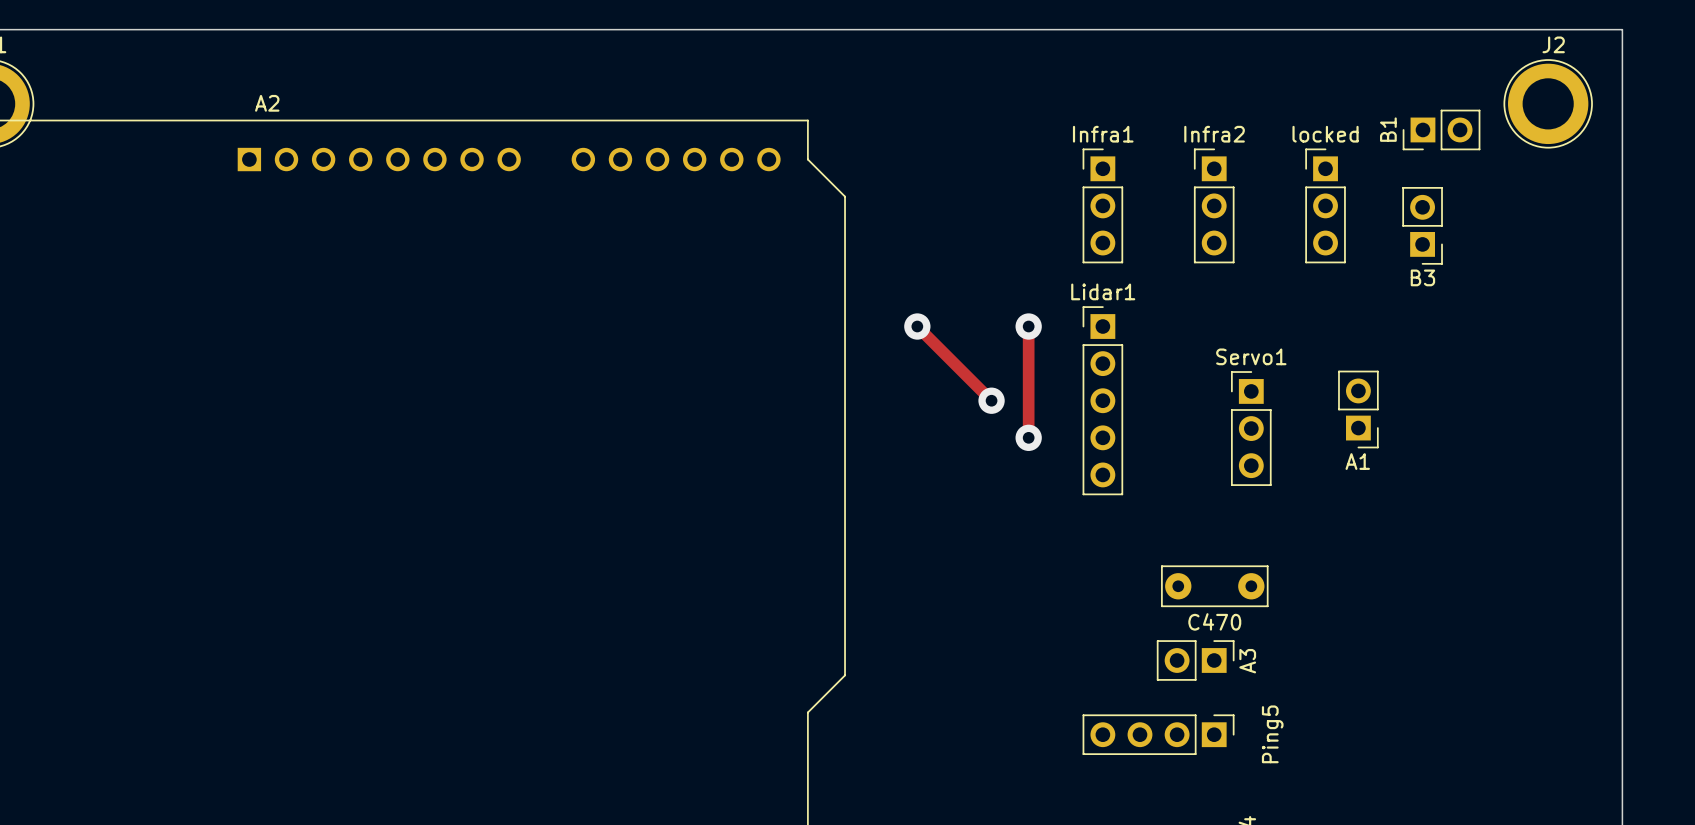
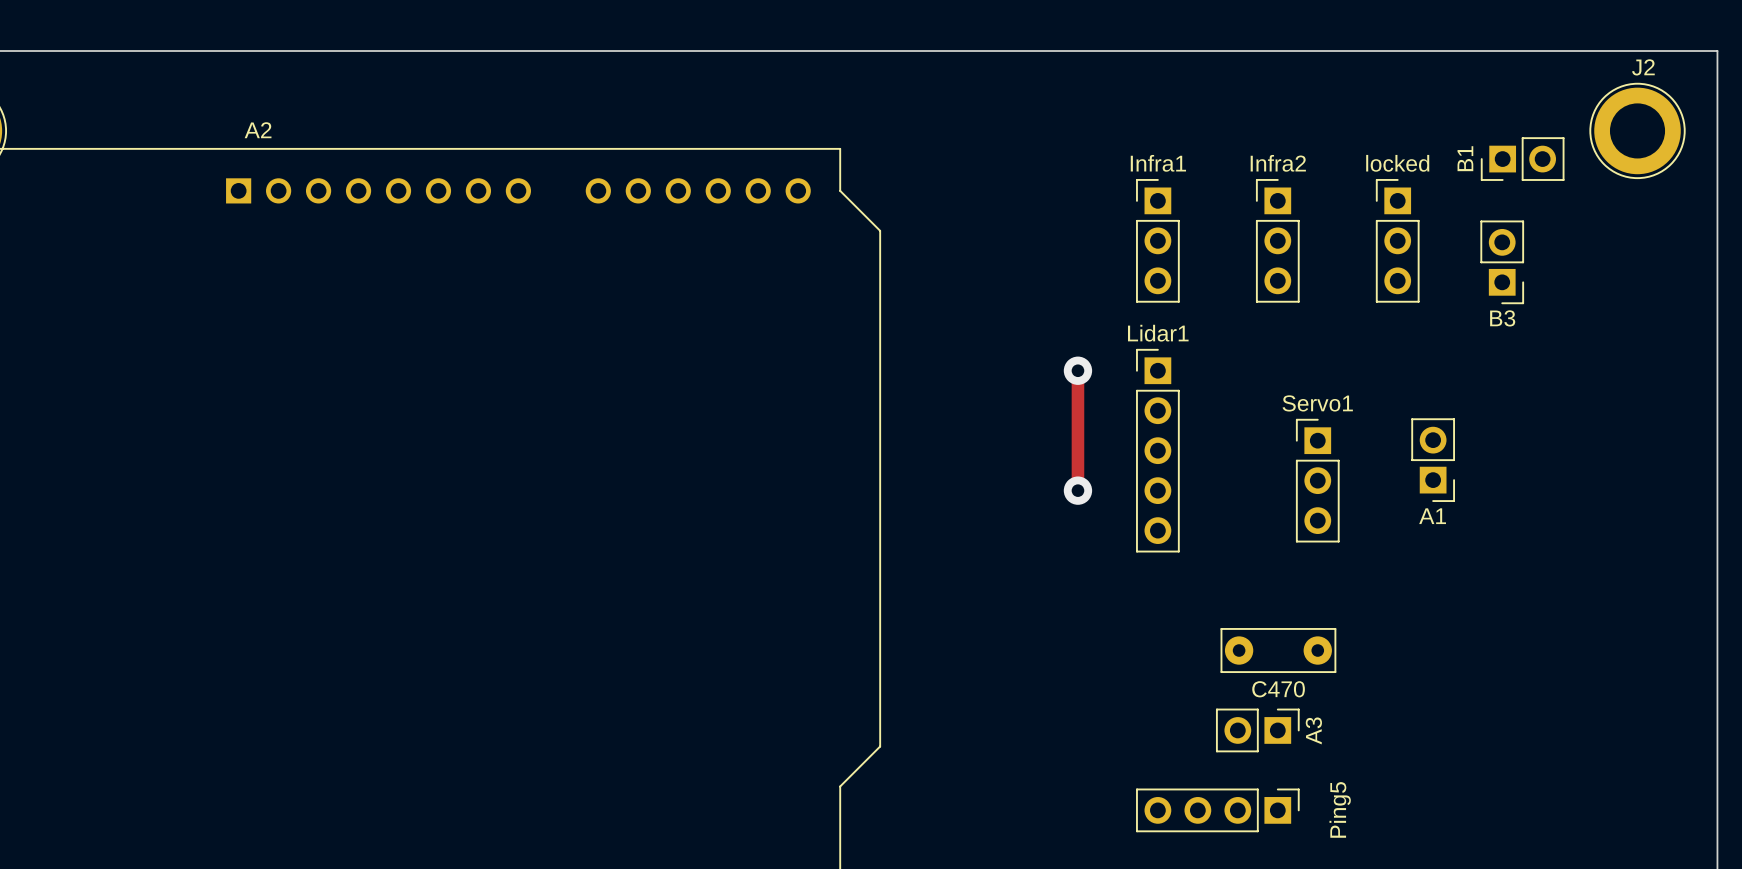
track: (917, 326) (991, 400) -> none
via: (917, 326) -> none
via: (991, 400) -> none

